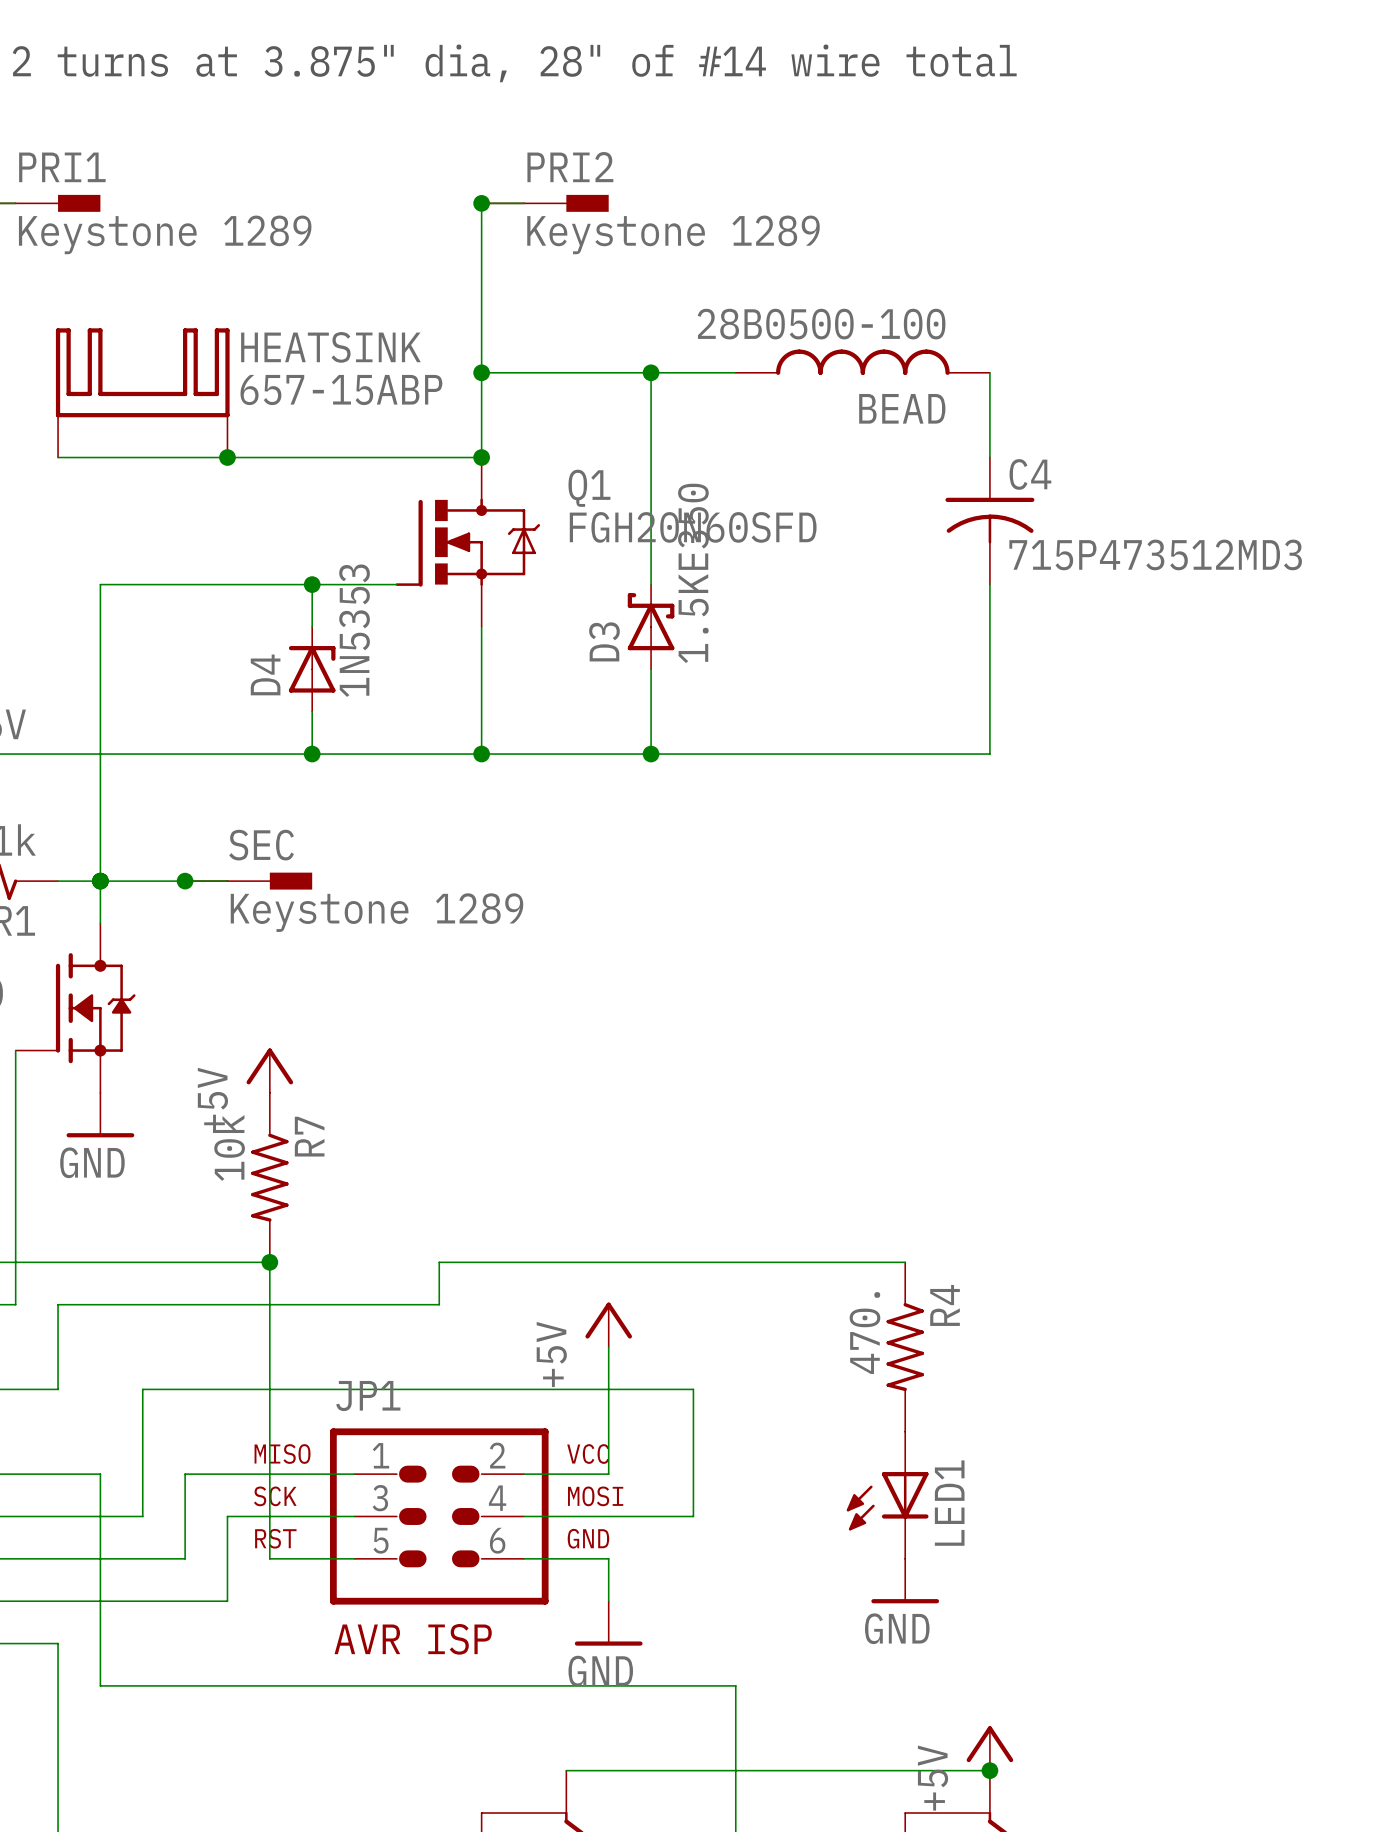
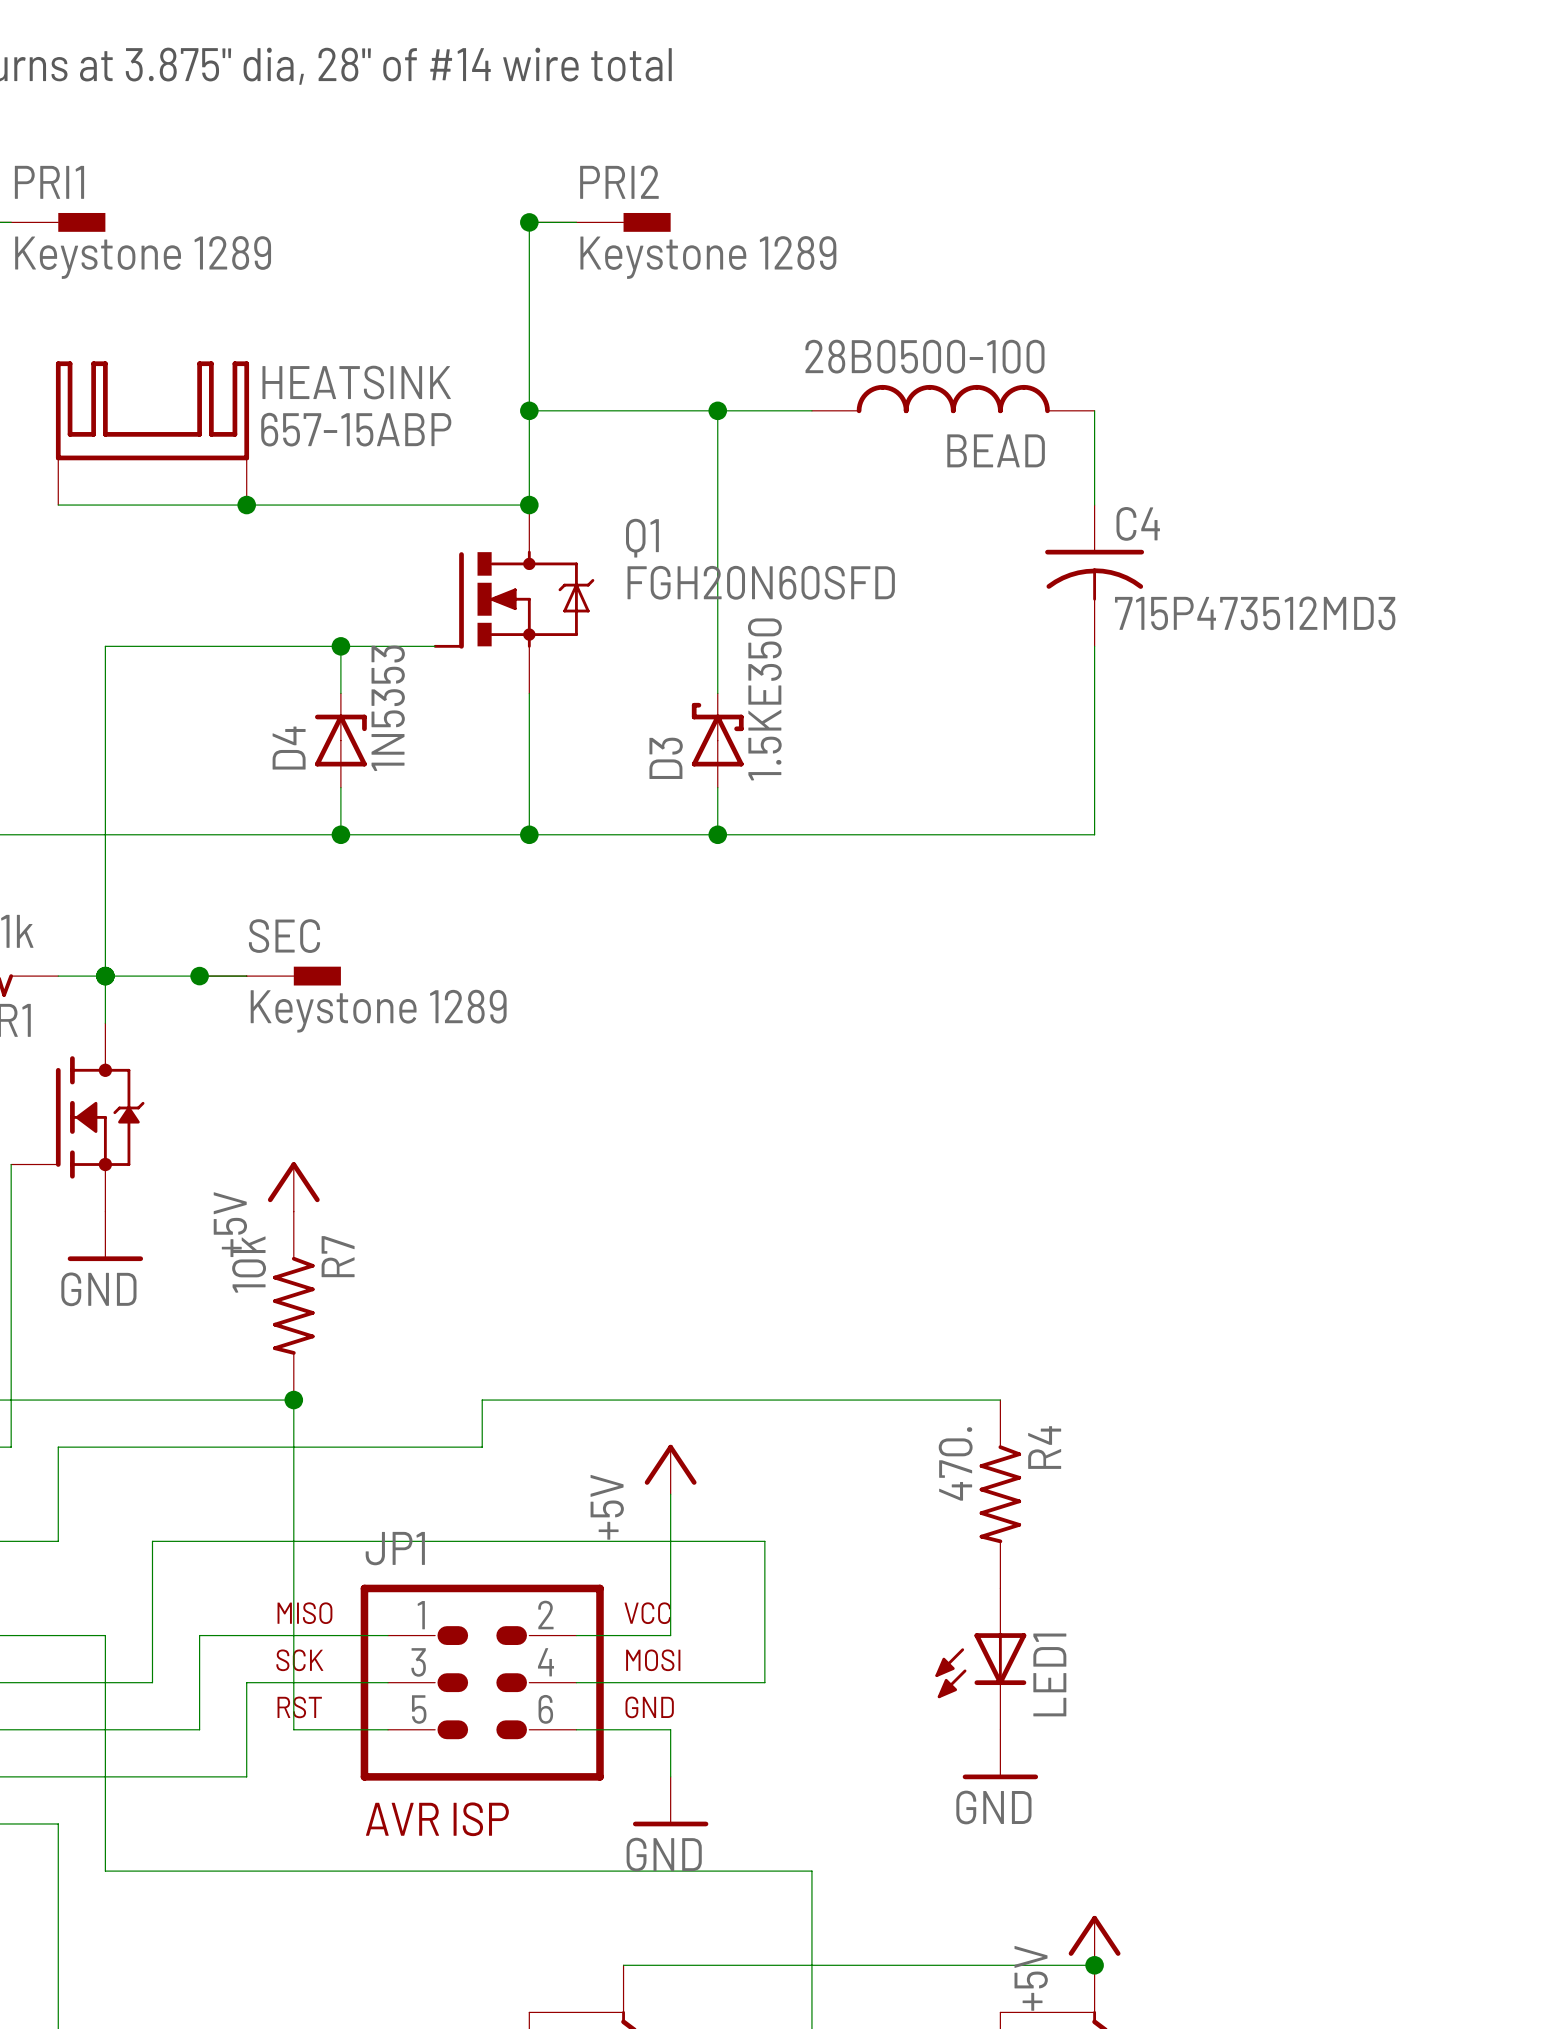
D3 position: (651, 626) -> (717, 740)

